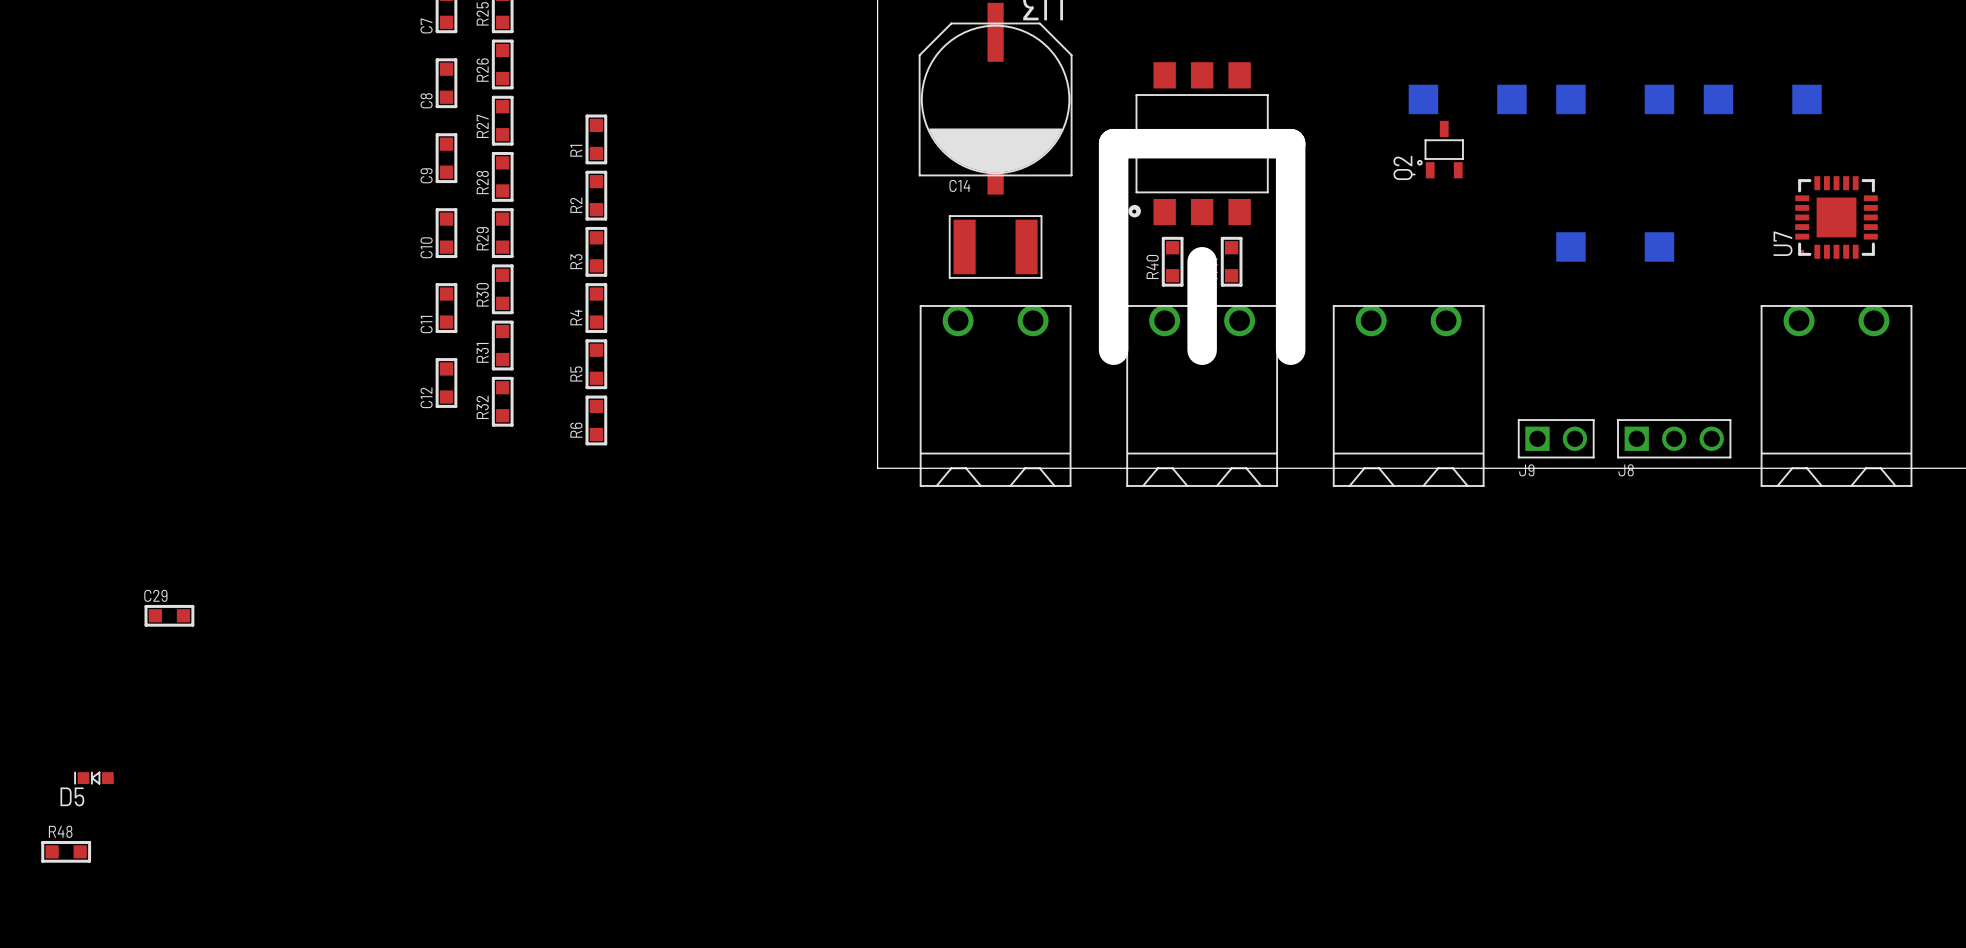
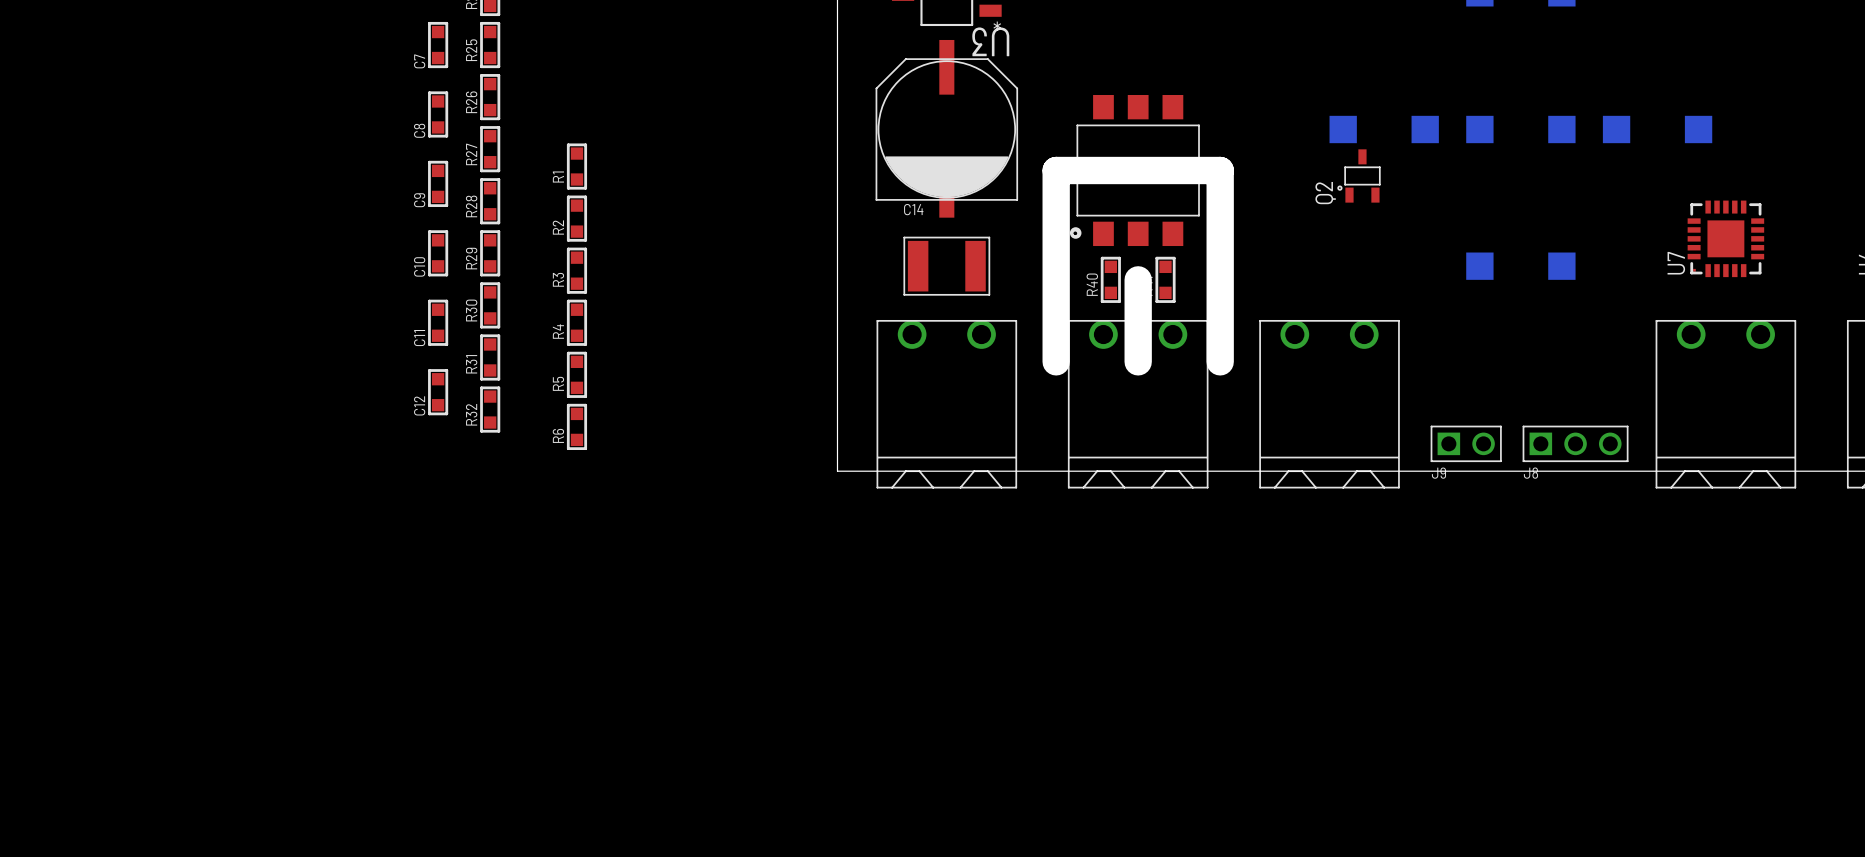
C29: (169, 615) -> none
D5: (93, 778) -> none
R48: (66, 851) -> none

